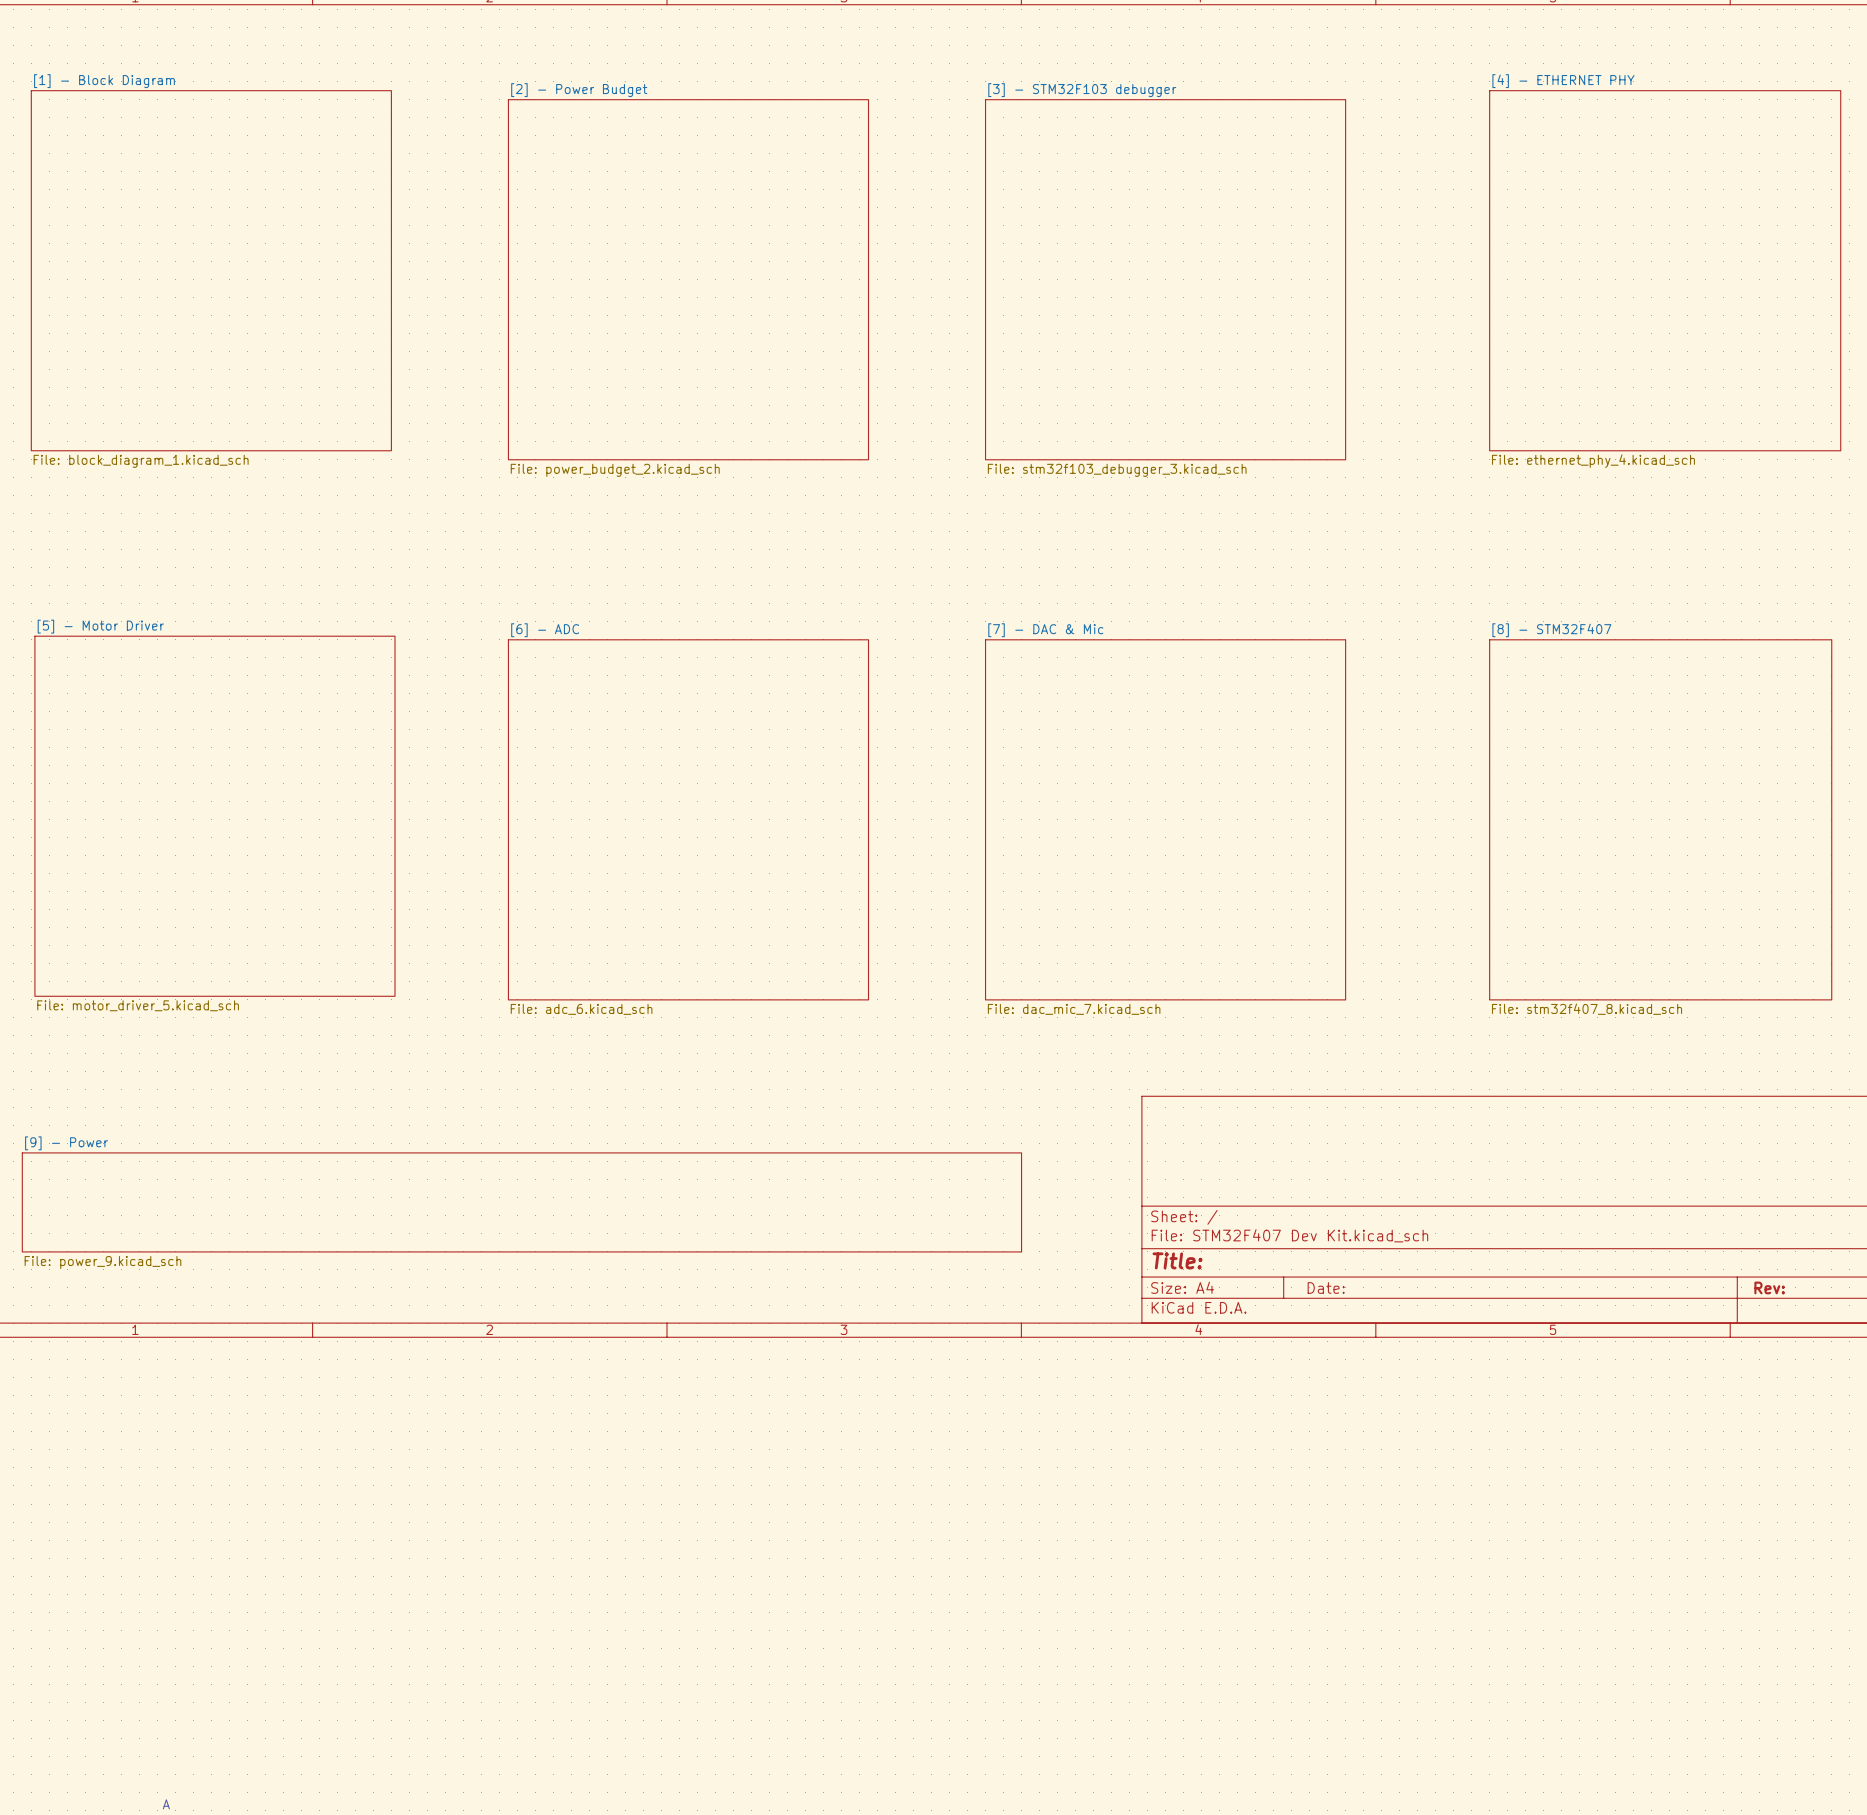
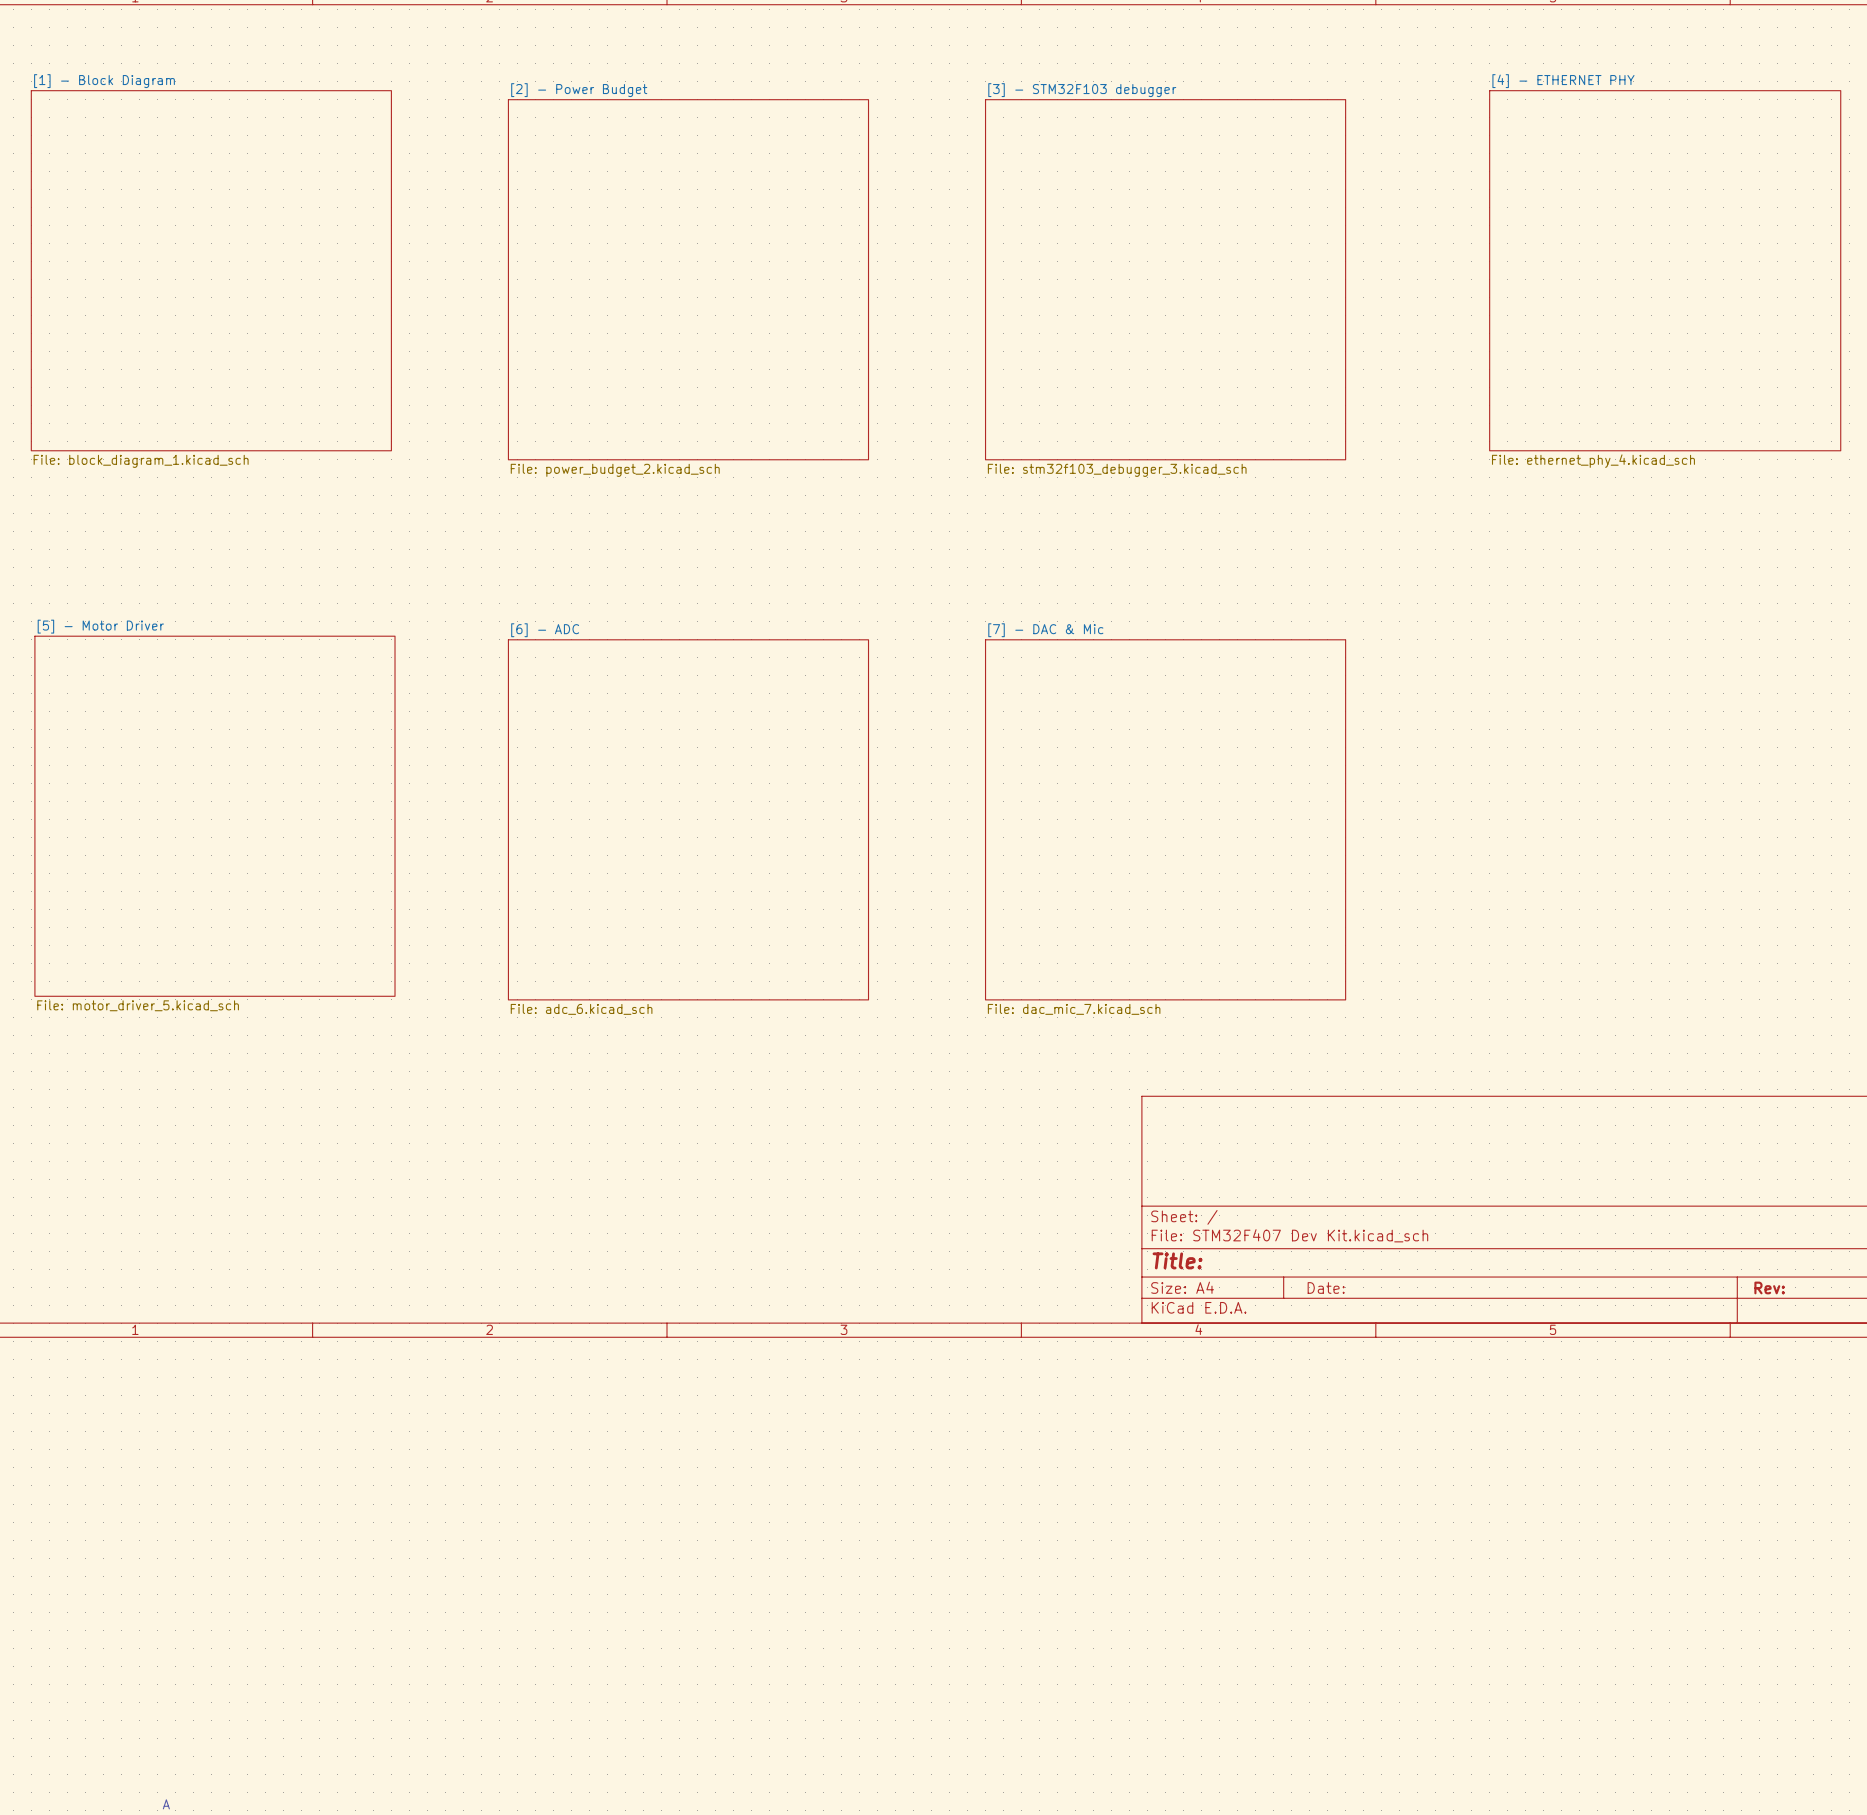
sheet [8] - STM32F407: File: stm32f407_8.kicad_sch (1660, 819) -> none
sheet [9] - Power: File: power_9.kicad_sch (521, 1202) -> none

